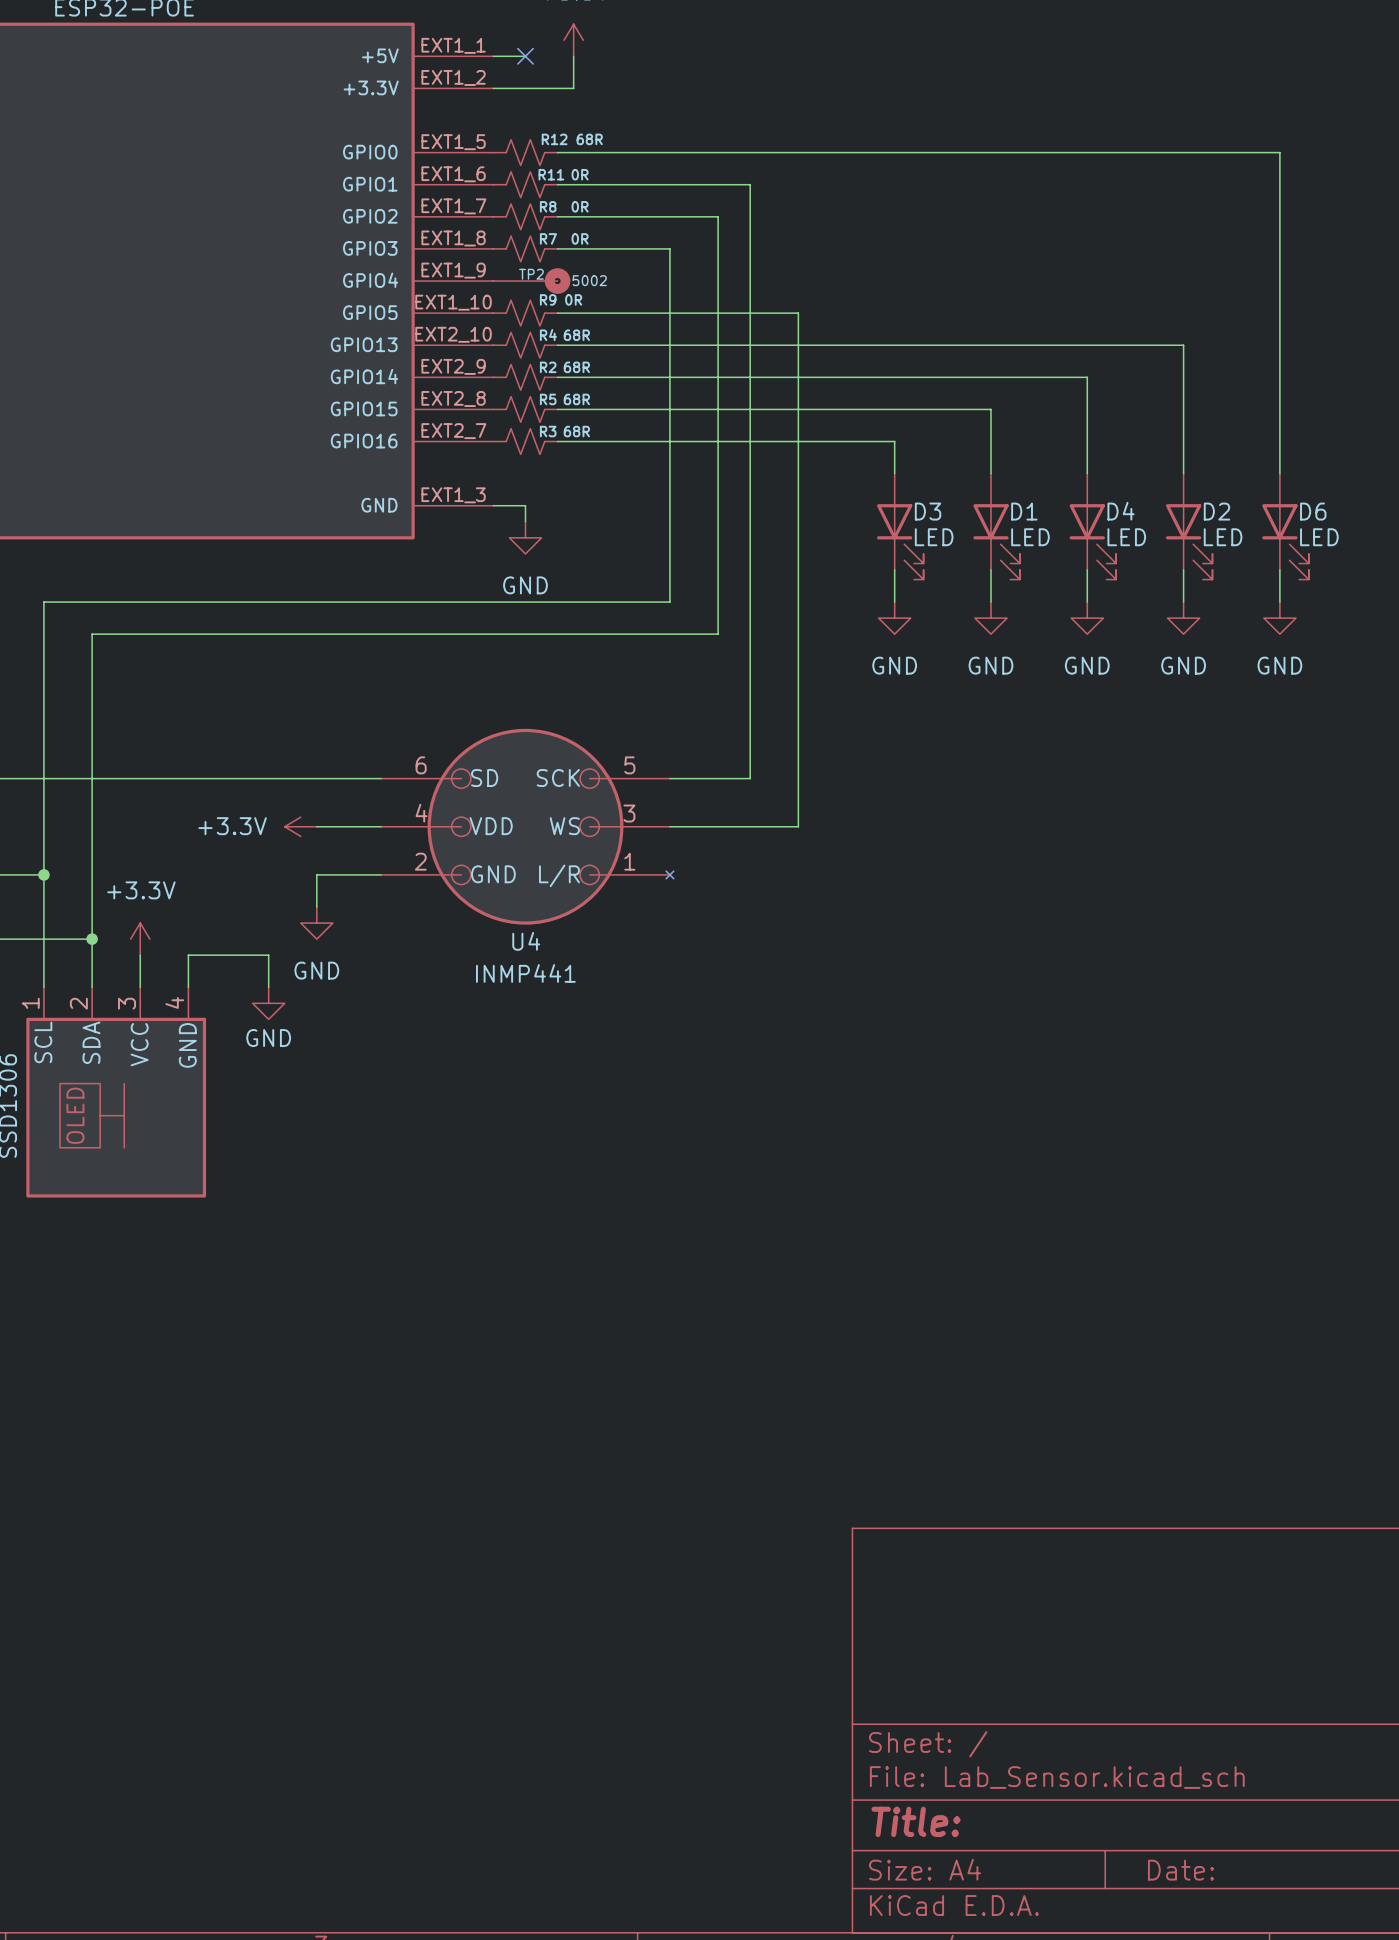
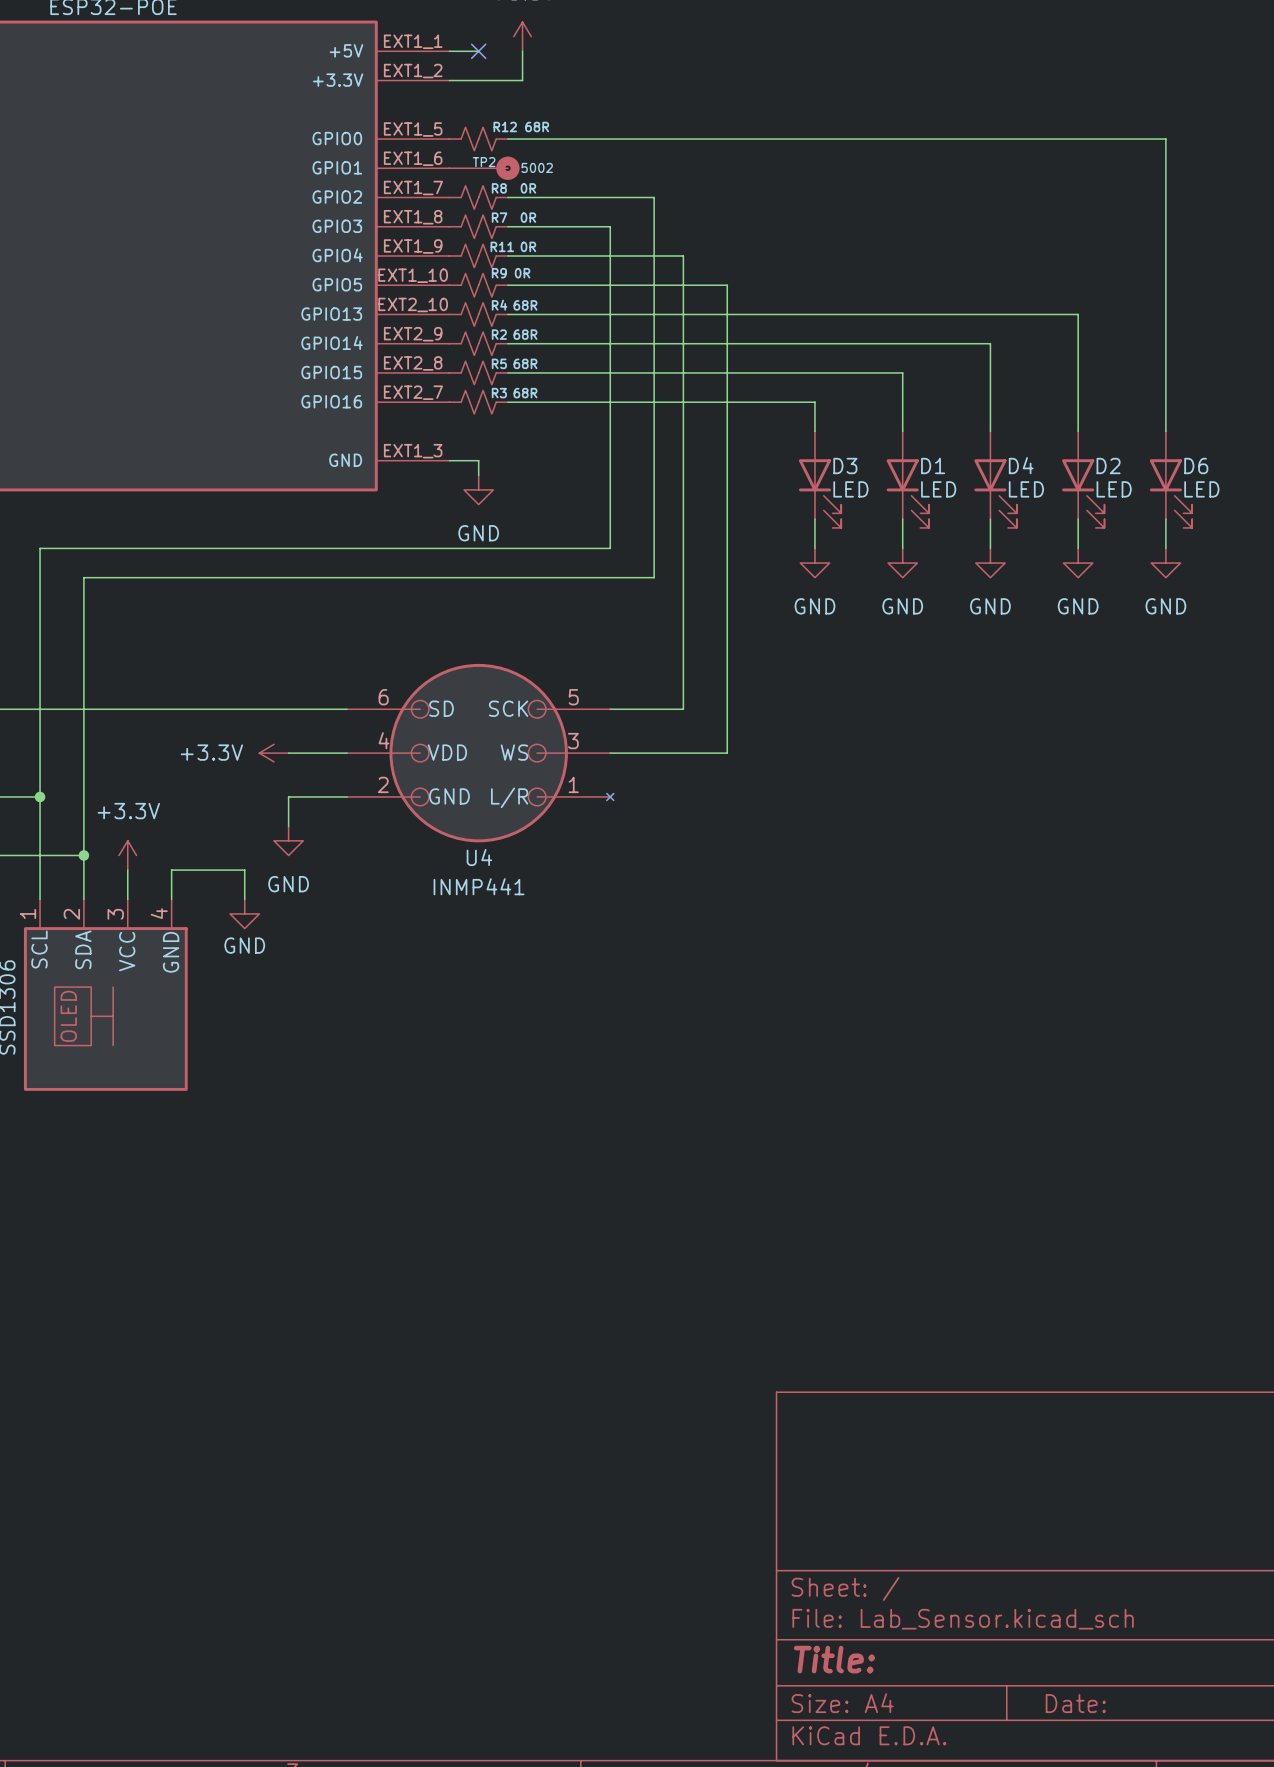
R11 position: (525, 184) -> (478, 255)
wire: (557, 184) (750, 184) (750, 281) -> (507, 255) (683, 255)
TP2 position: (531, 281) -> (484, 168)

